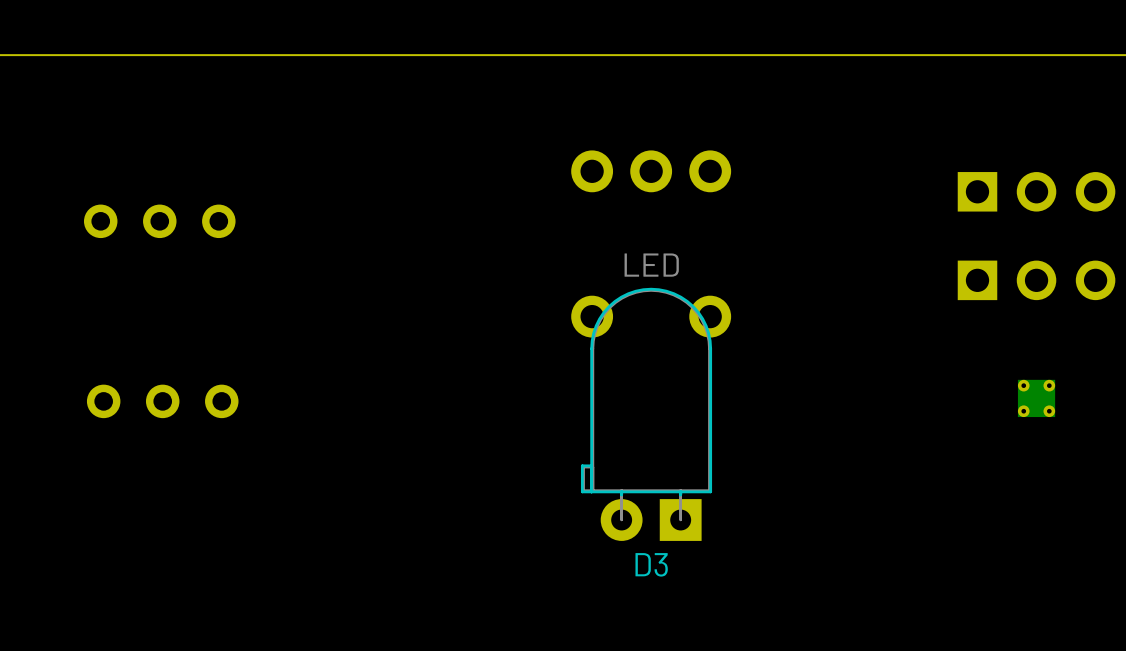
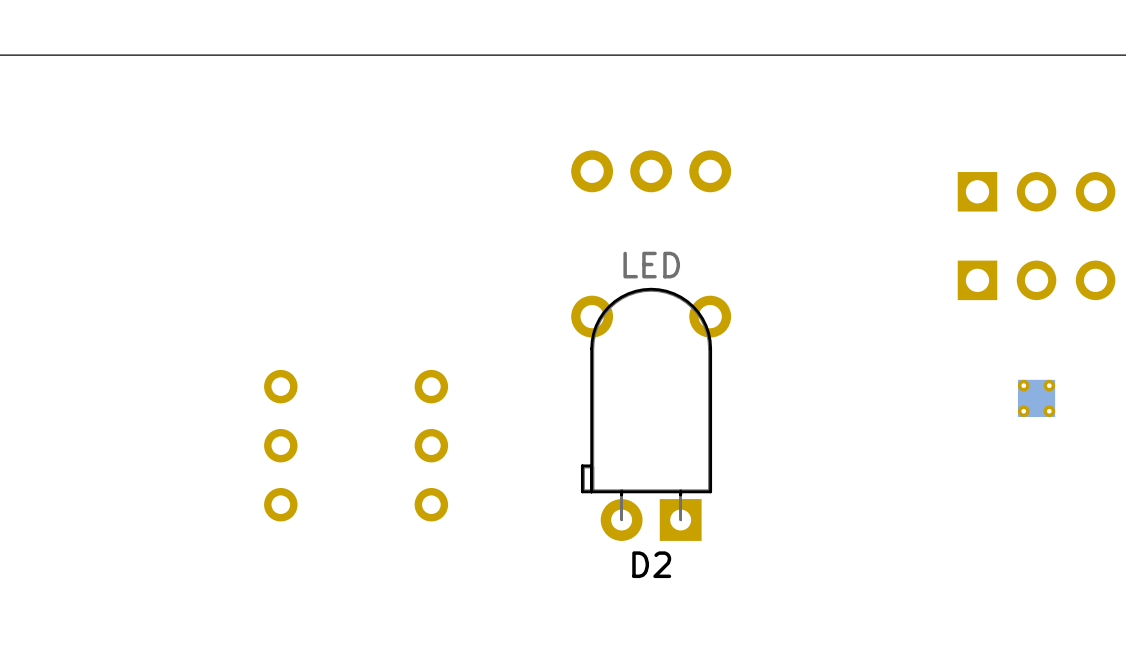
part: (159, 221) -> none
part rotation: 0° (162, 401) -> 90° clockwise (280, 445)
part position: (162, 401) -> (280, 445)
part: none -> (431, 445)
D3 name: D3 (651, 564) -> D2 (651, 564)

